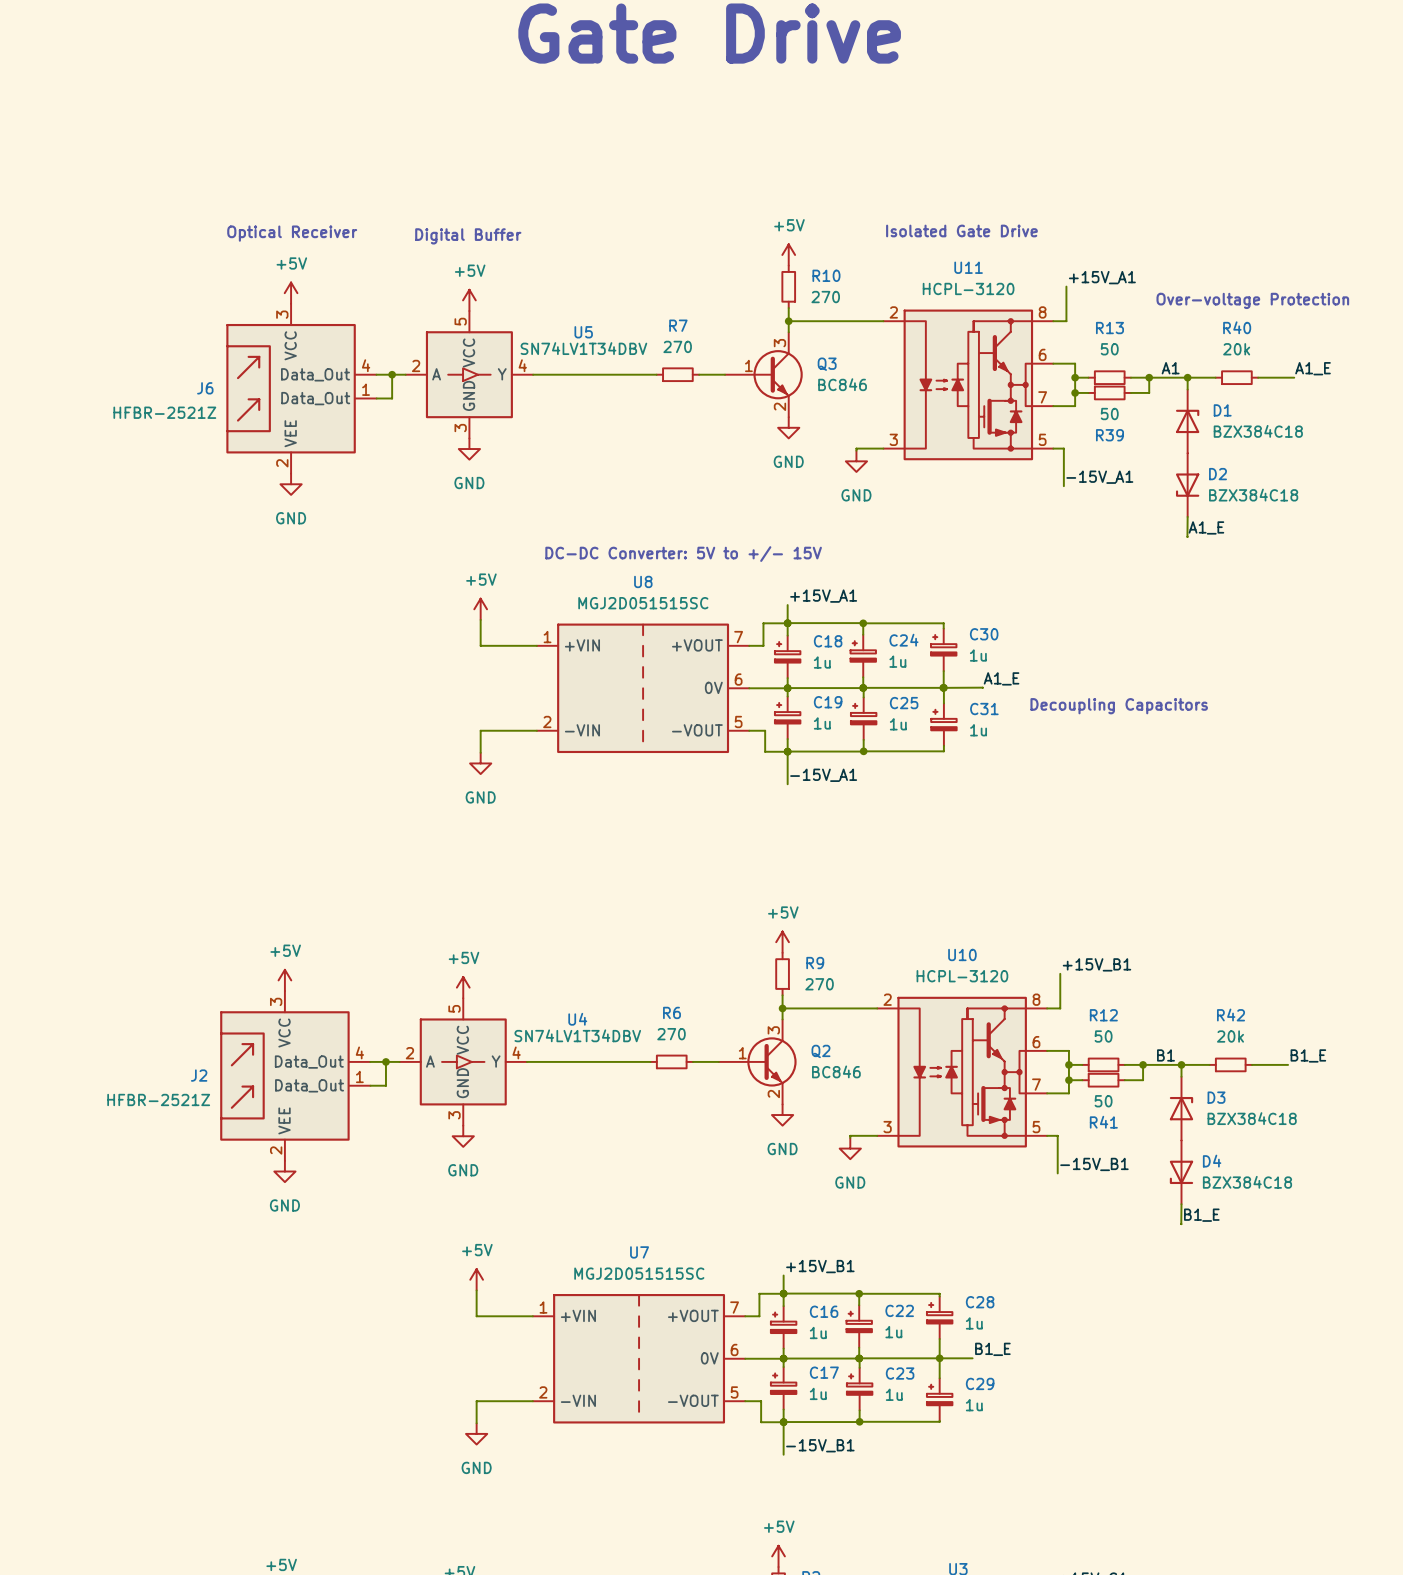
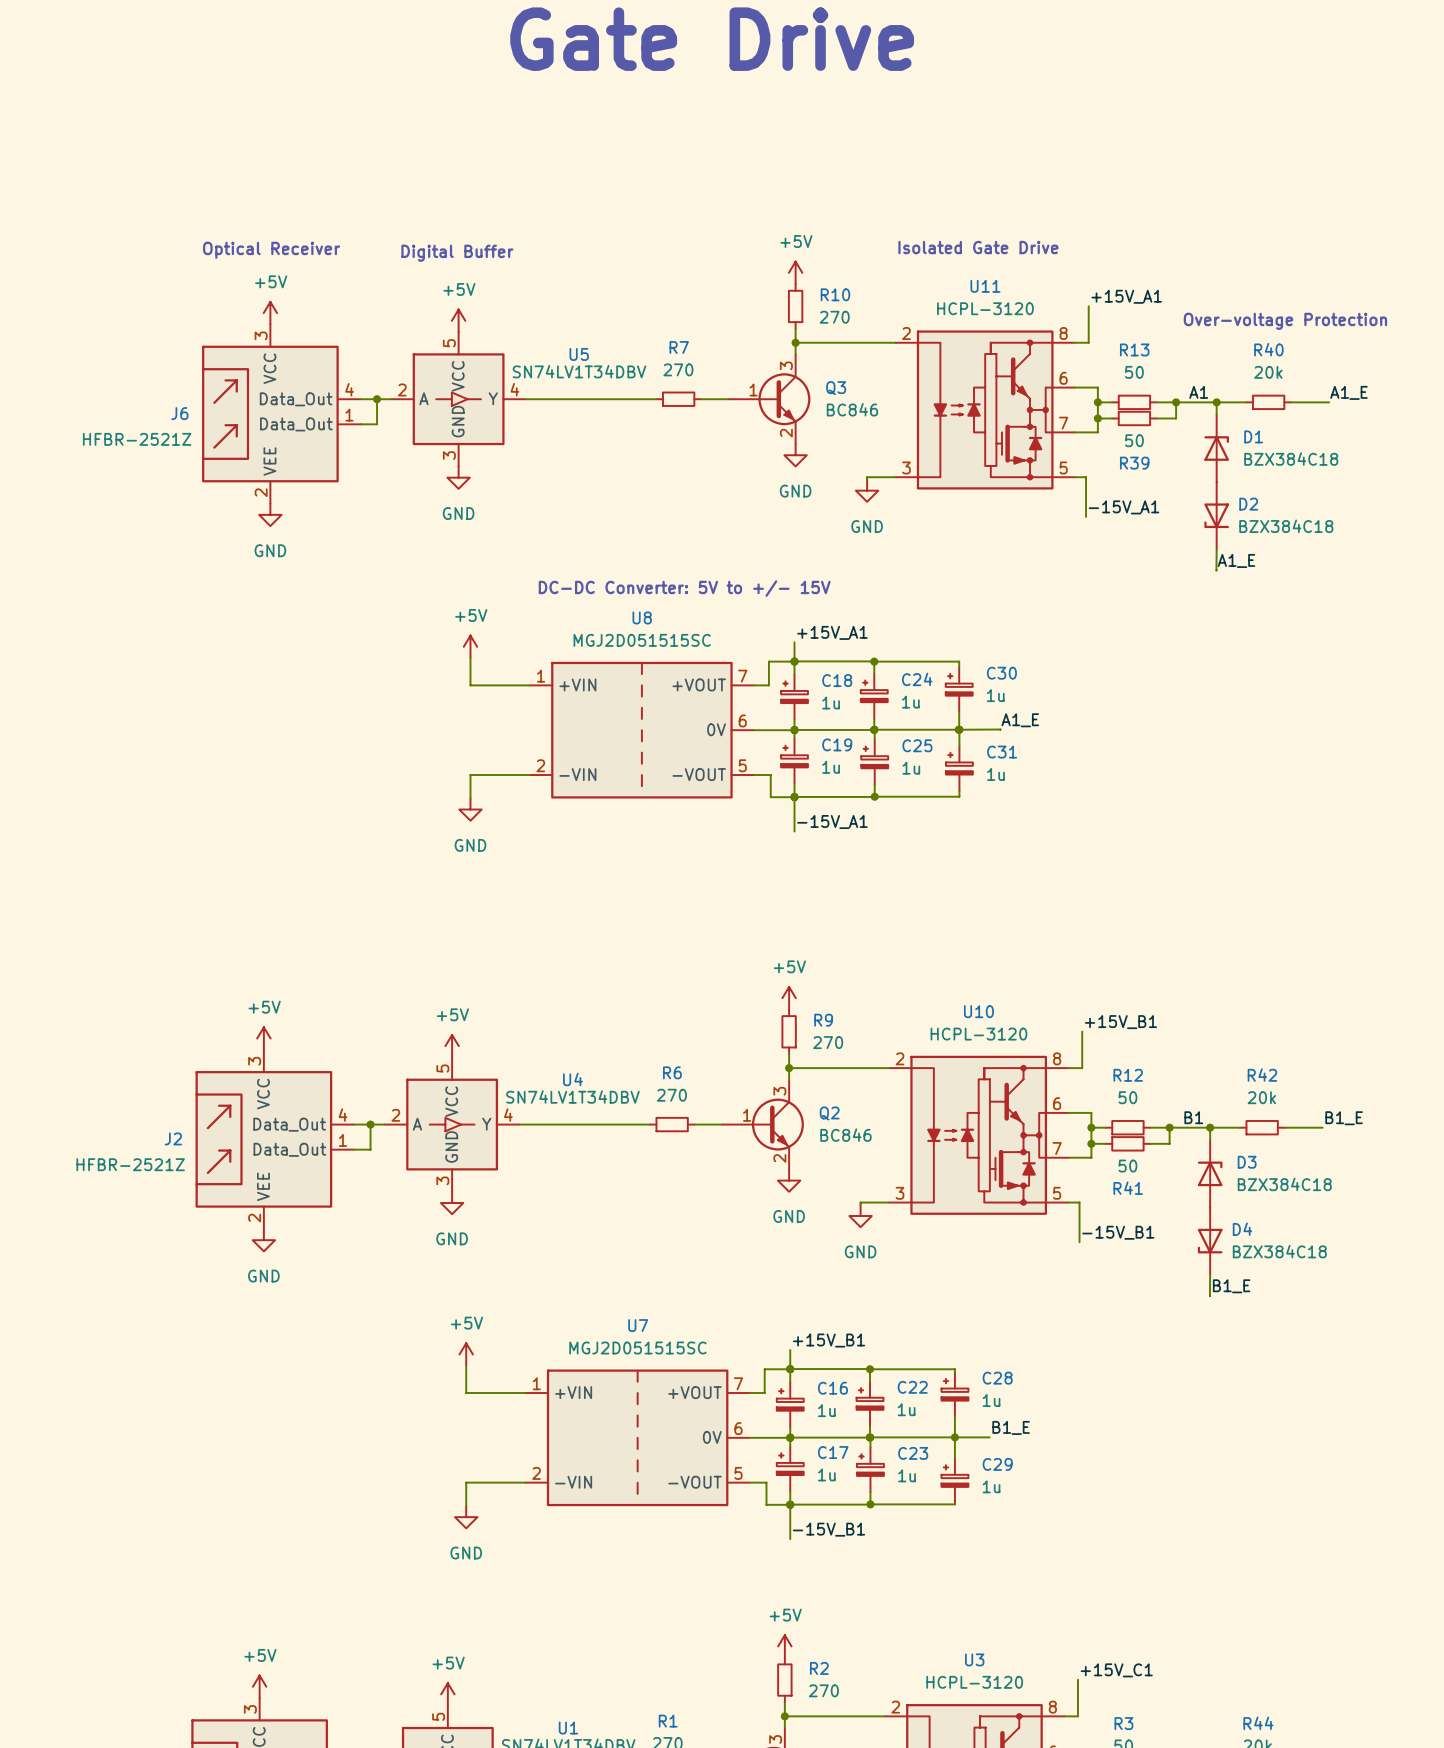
text: Decoupling Capacitors (1119, 706) -> none

